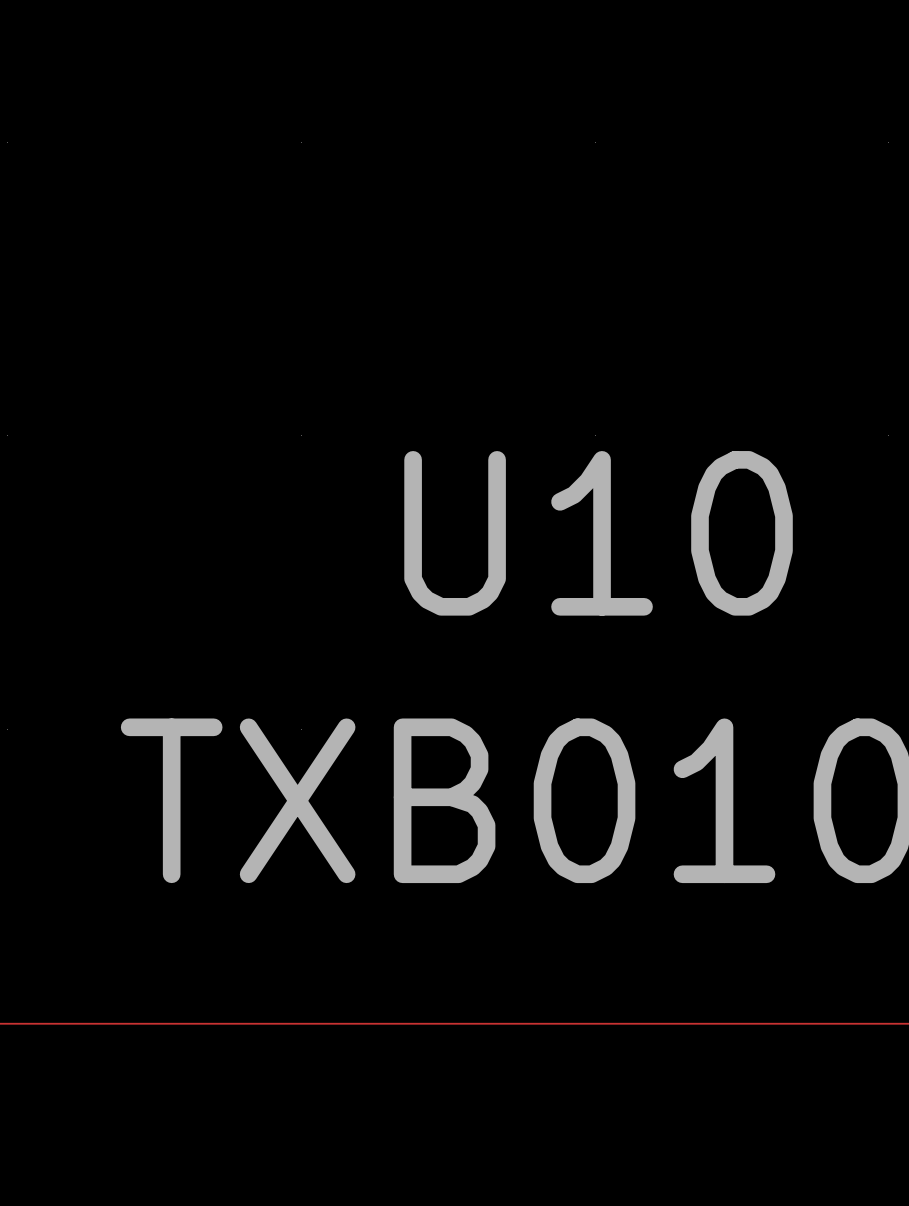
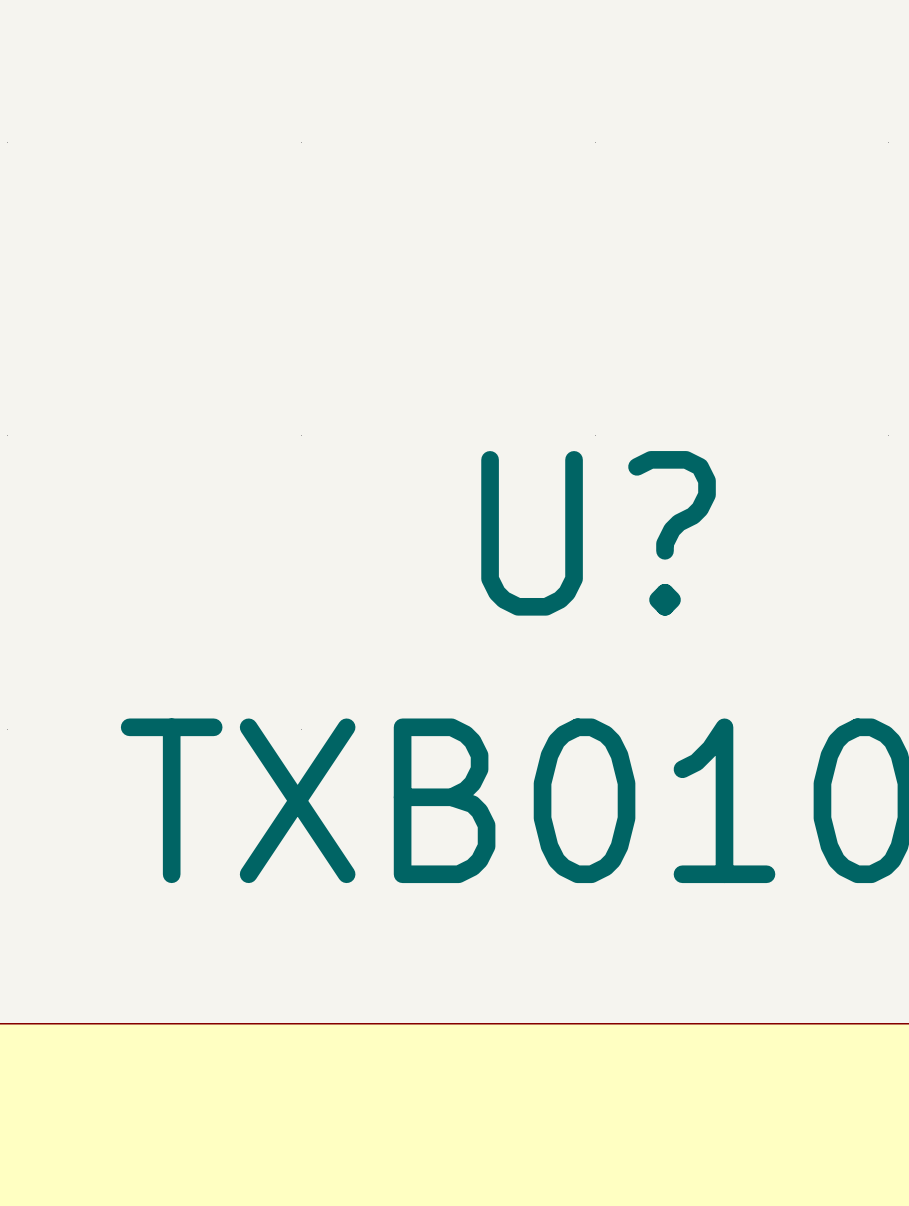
U10 name: U10 (598, 533) -> U? (598, 533)

